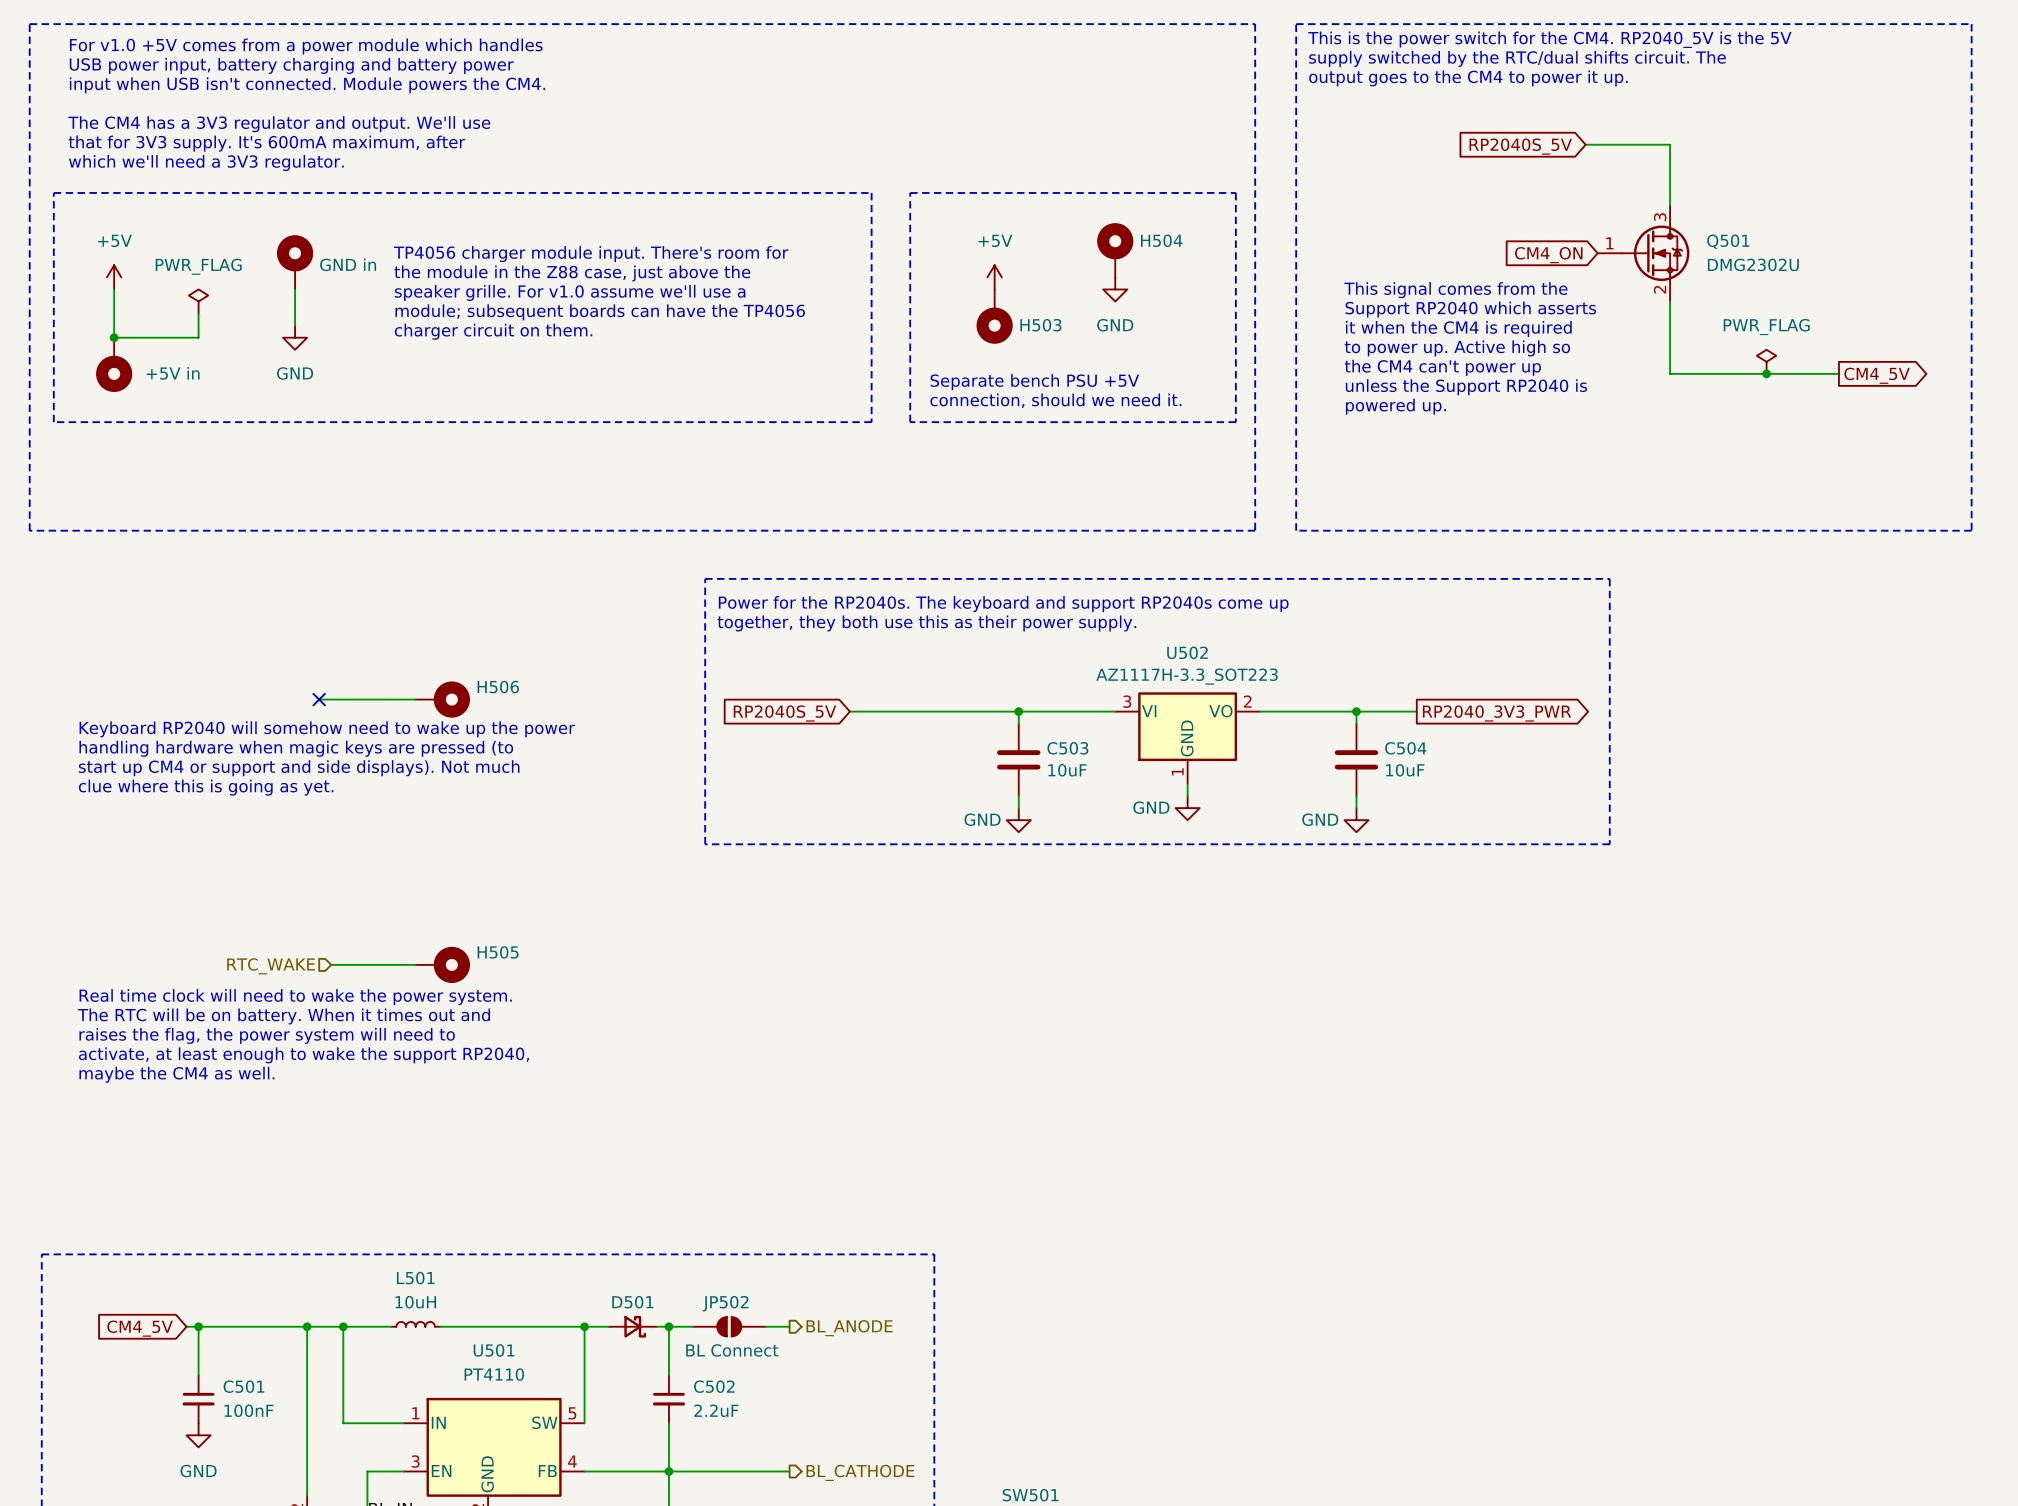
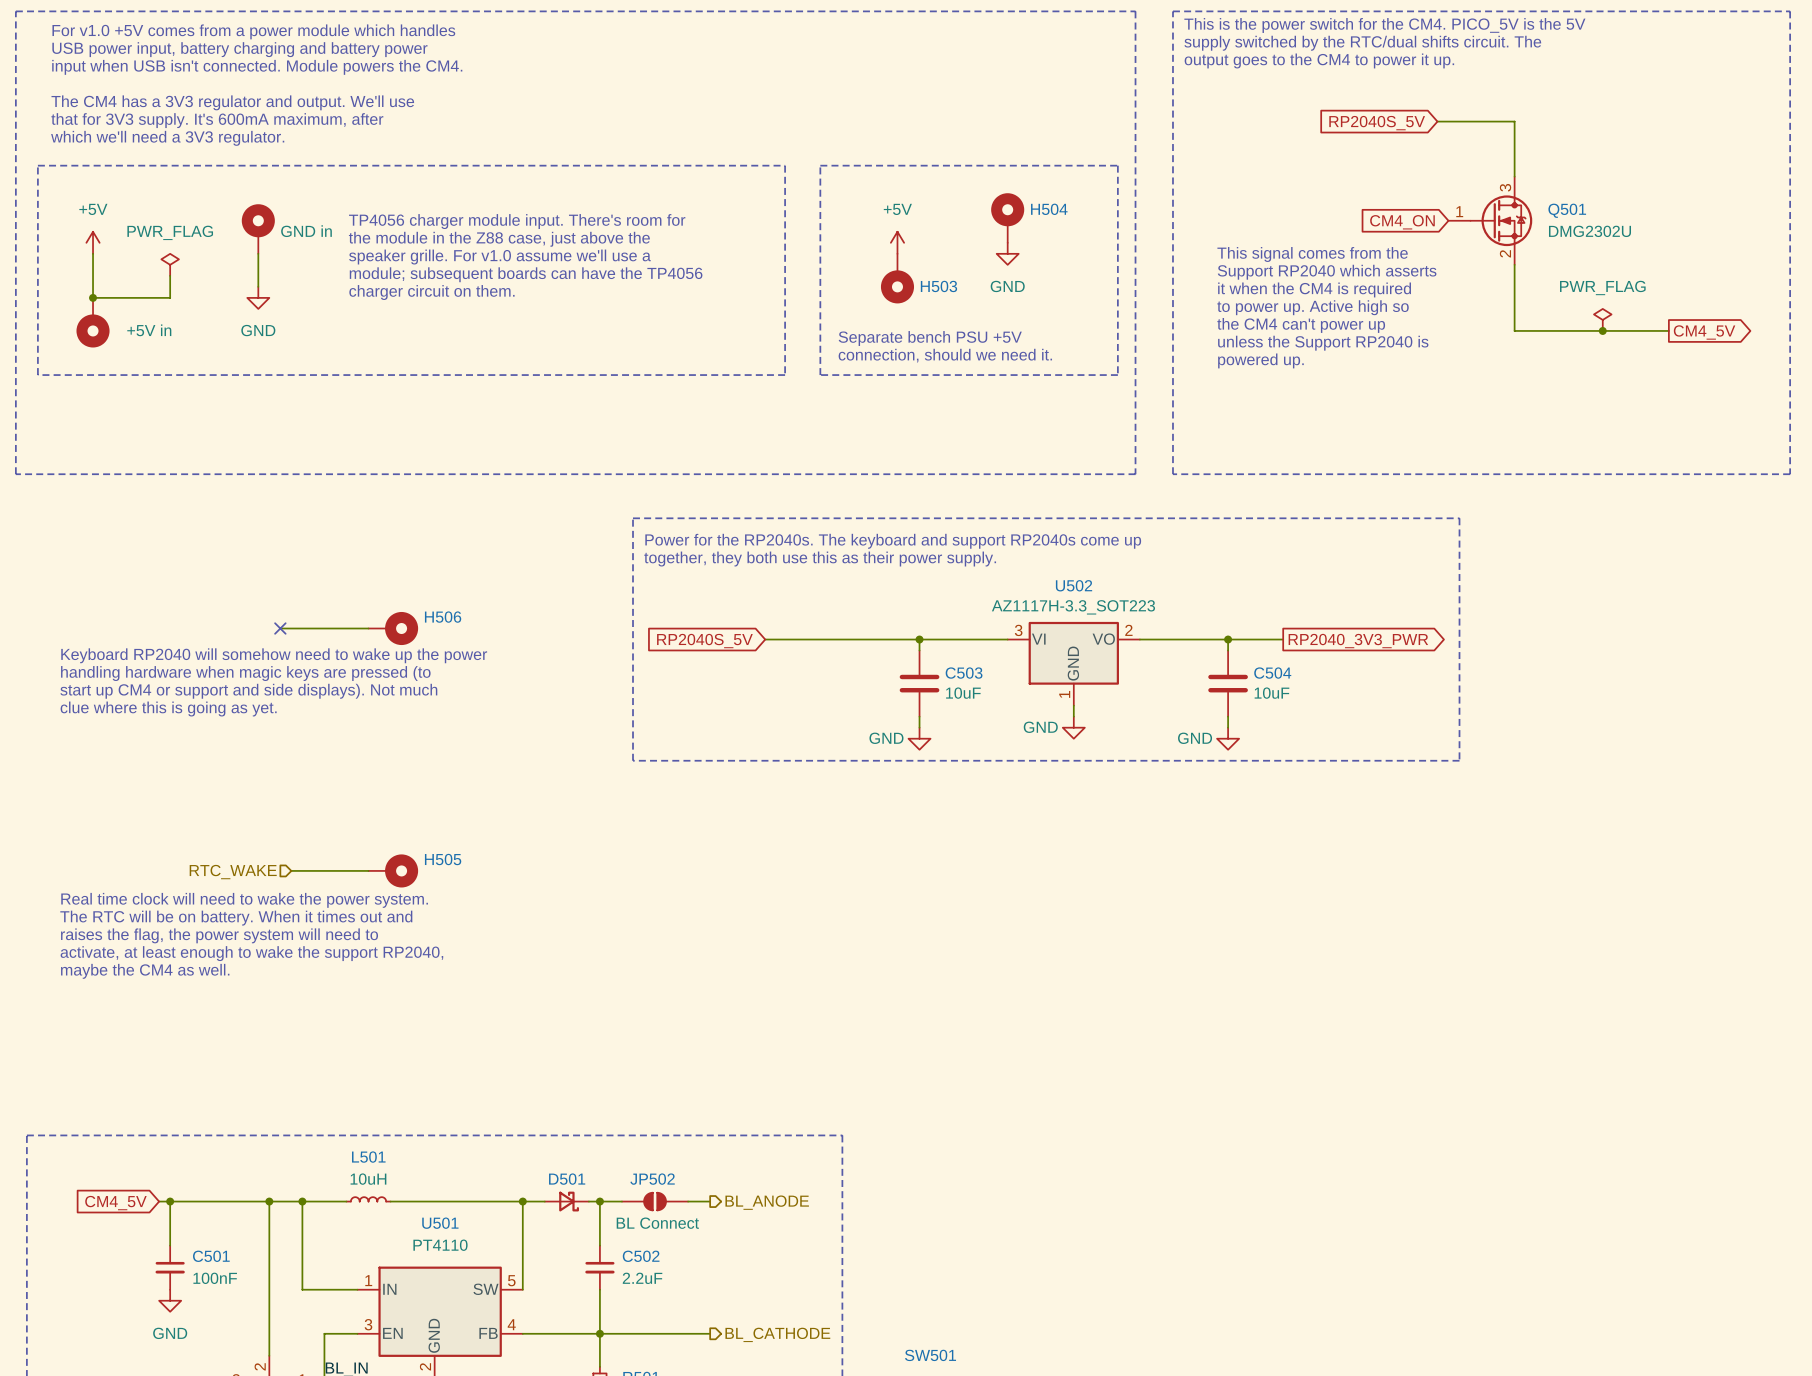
text: This is the power switch for the CM4. RP2040_5V is the 5V (1549, 39) -> This is the power switch for the CM4. PICO_5V is the 5V (1384, 25)

